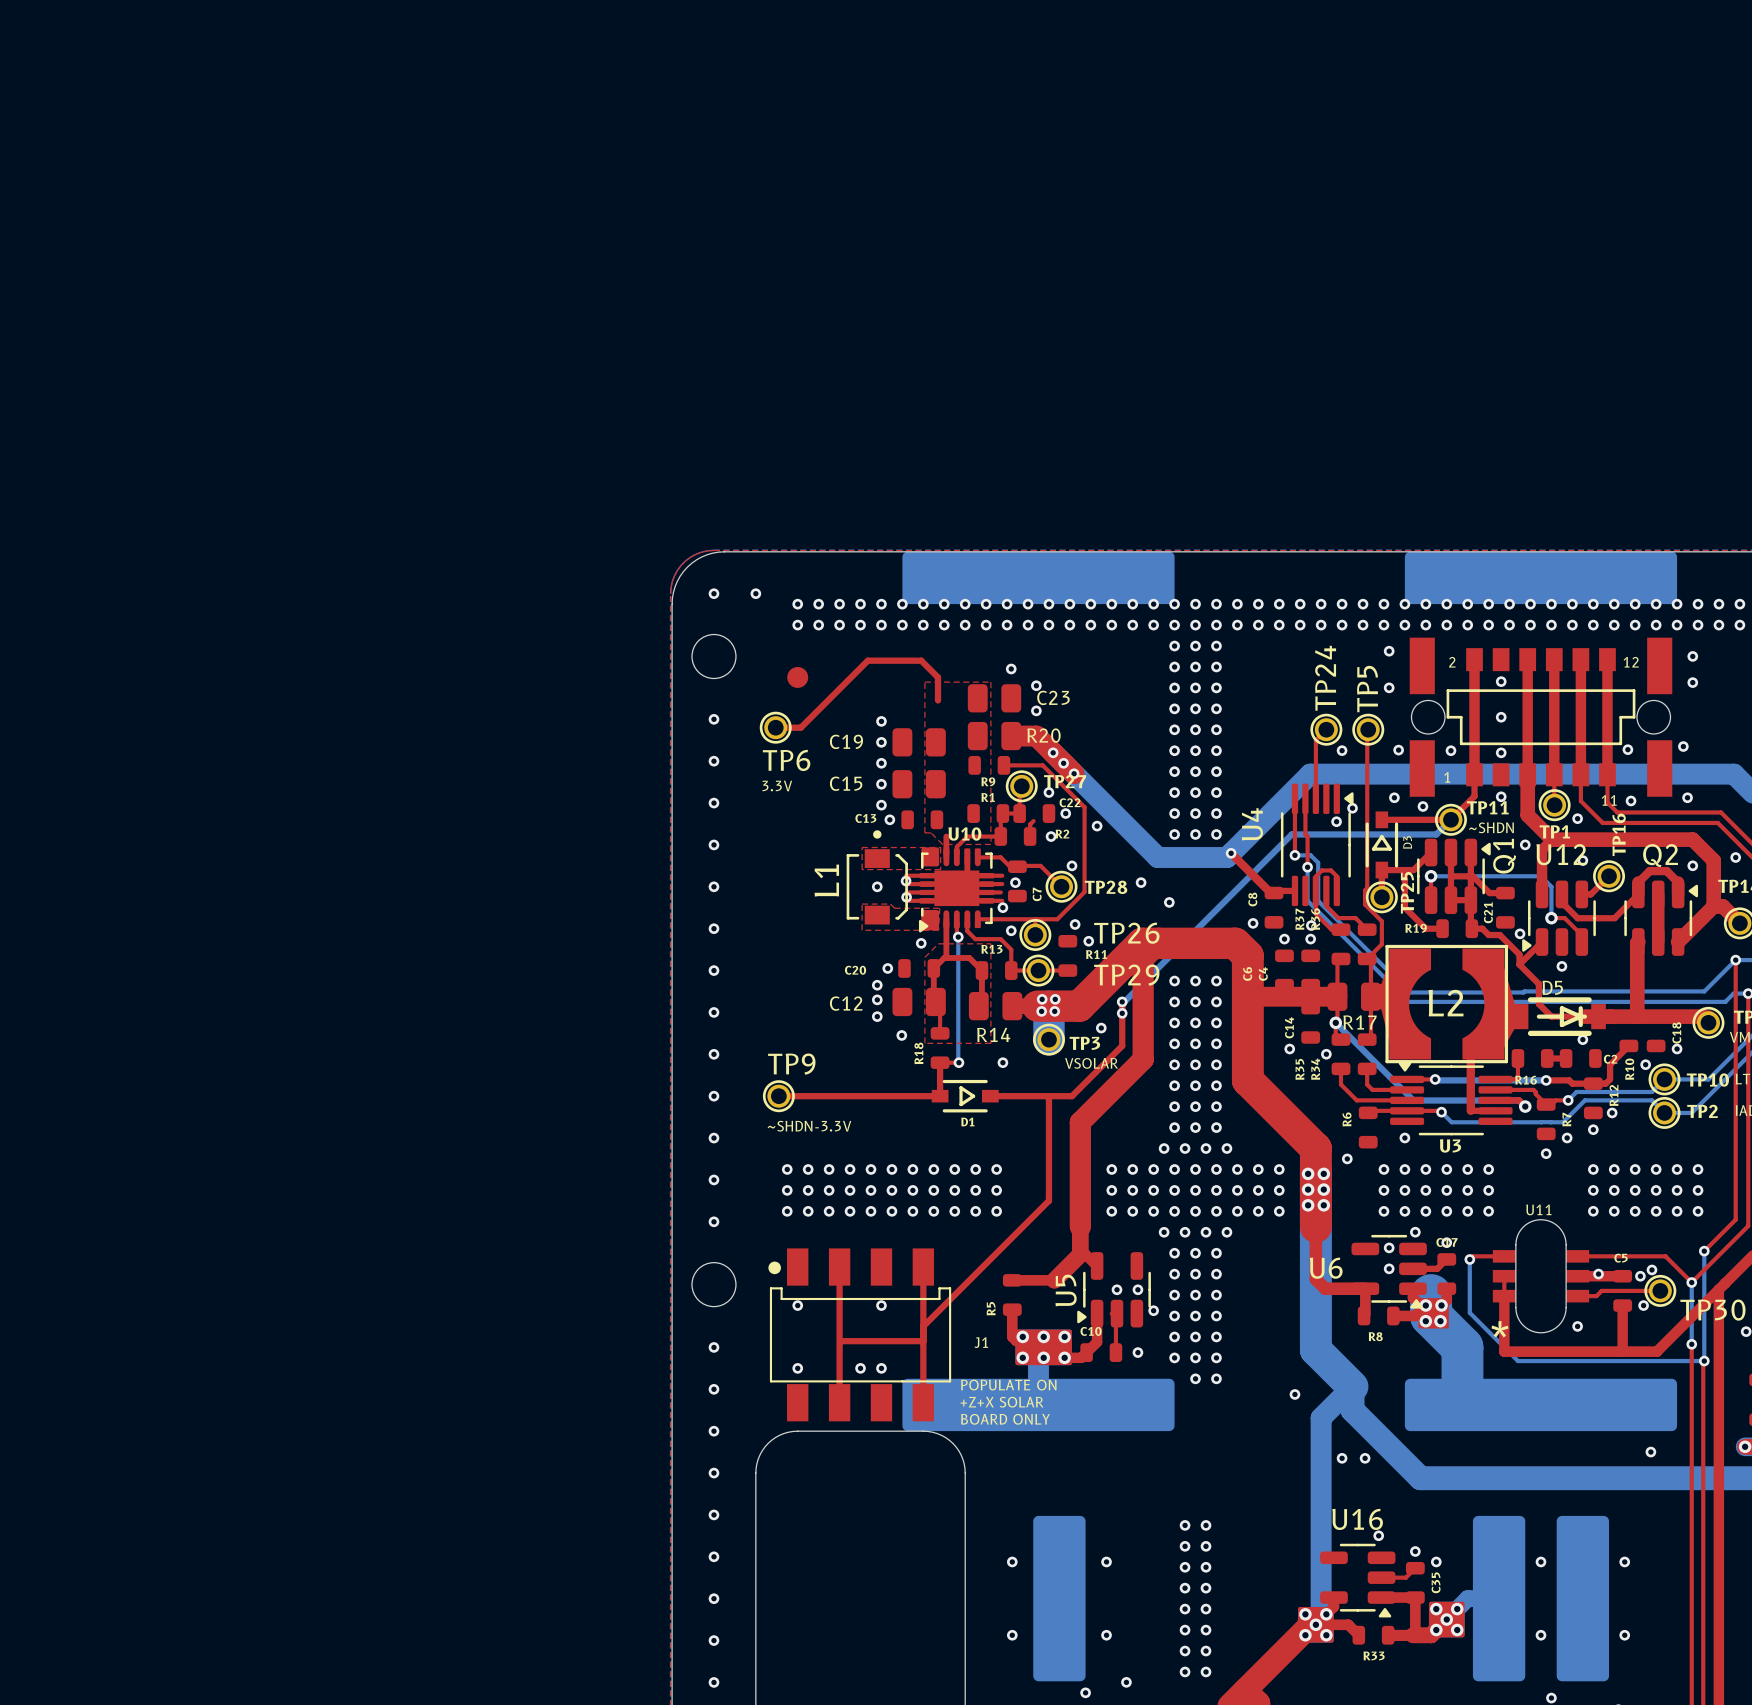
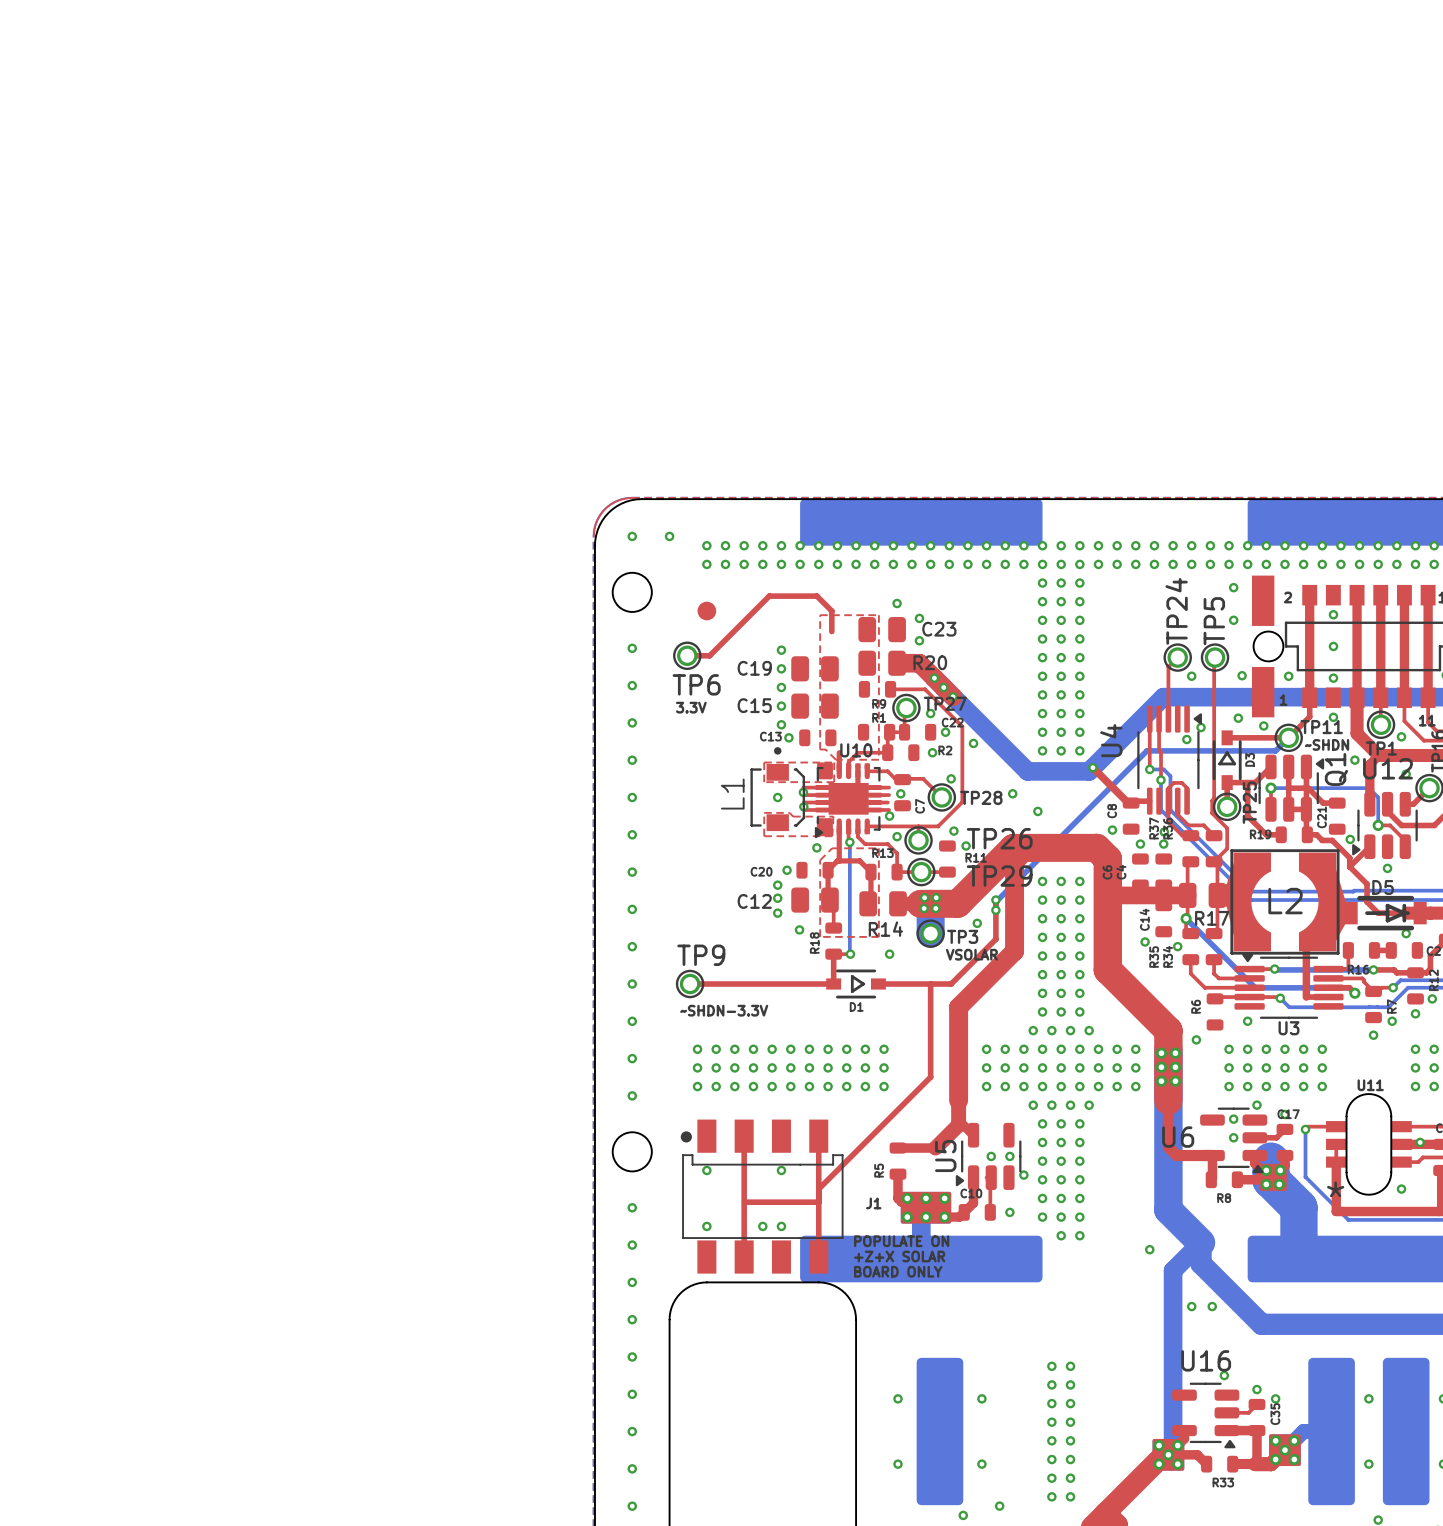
top track: (1033, 821) (1030, 824) (1030, 836) -> none

